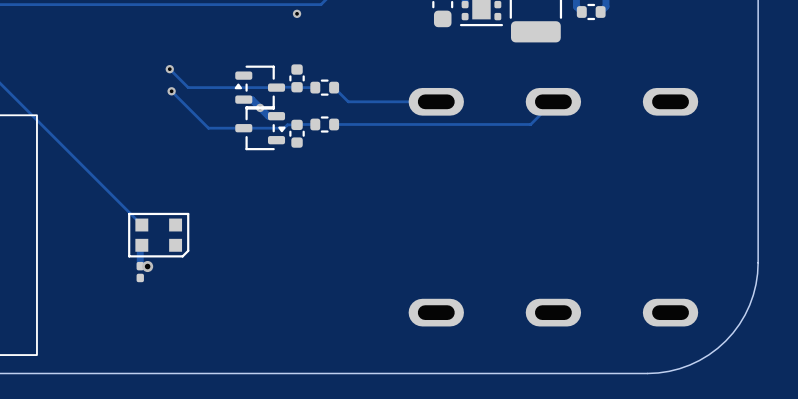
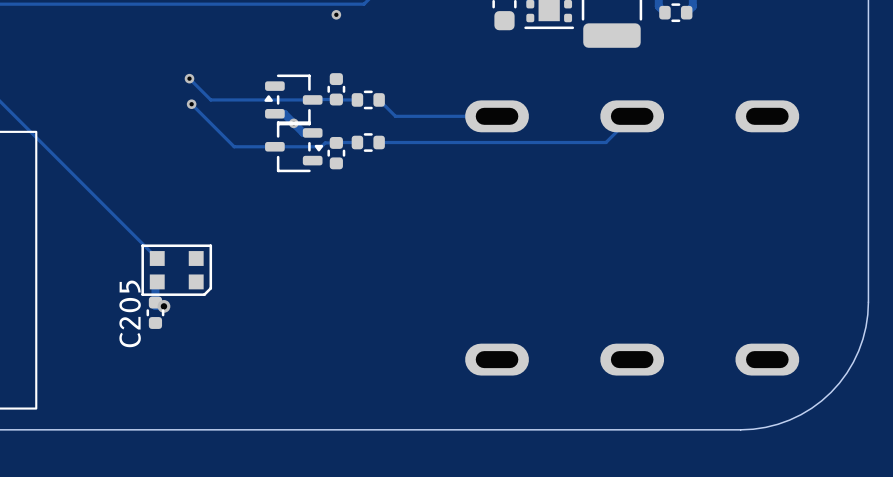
part: (140, 272) -> none
C205: none -> (155, 312)

